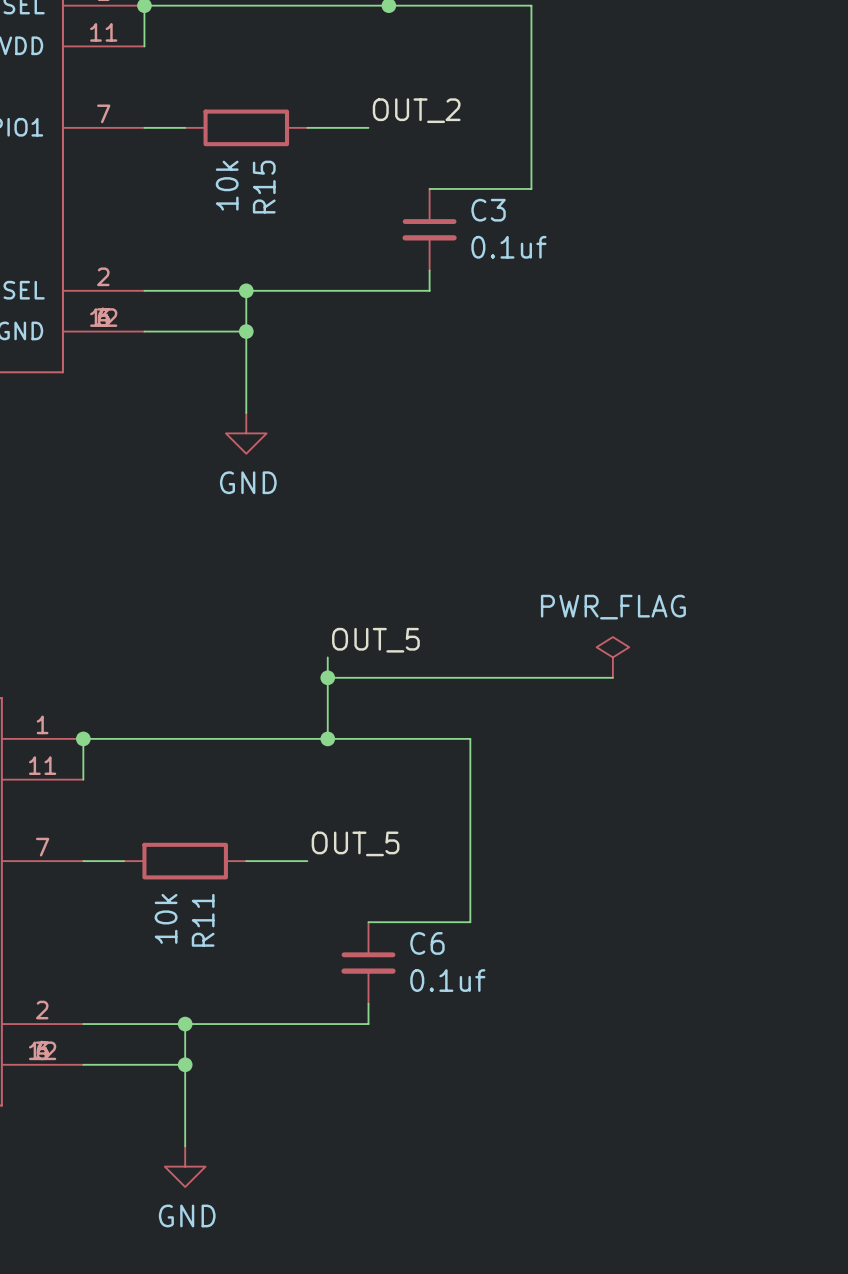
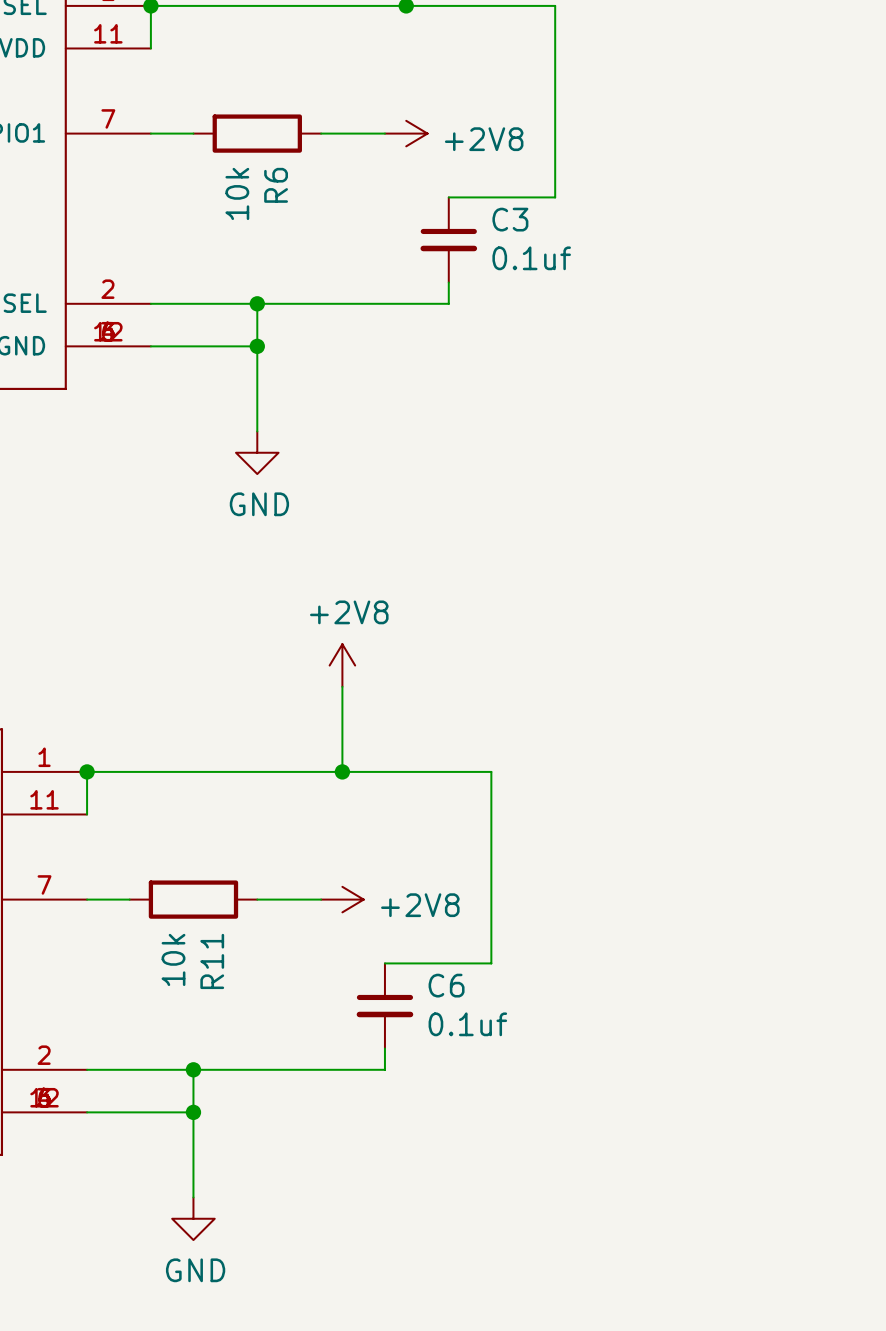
label: OUT_2 (416, 110) -> none
power symbol: none -> +2V8 (406, 133)
R15 name: R15 (264, 187) -> R6 (276, 185)
power symbol: none -> +2V8 (342, 665)
label: OUT_5 (375, 640) -> none
power symbol: PWR_FLAG (612, 657) -> none
wire: (327, 677) (612, 677) -> none
junction: (327, 677) -> none
label: OUT_5 (355, 843) -> none
power symbol: none -> +2V8 (342, 899)

